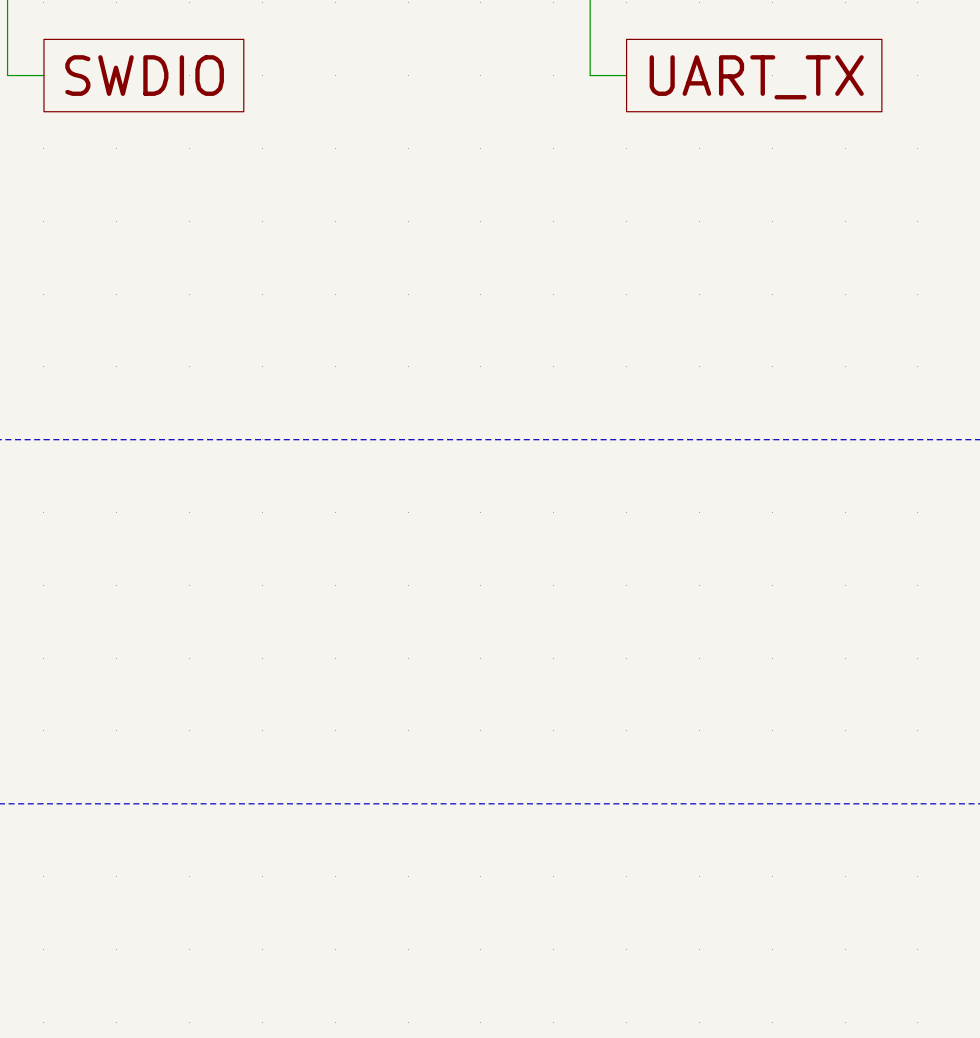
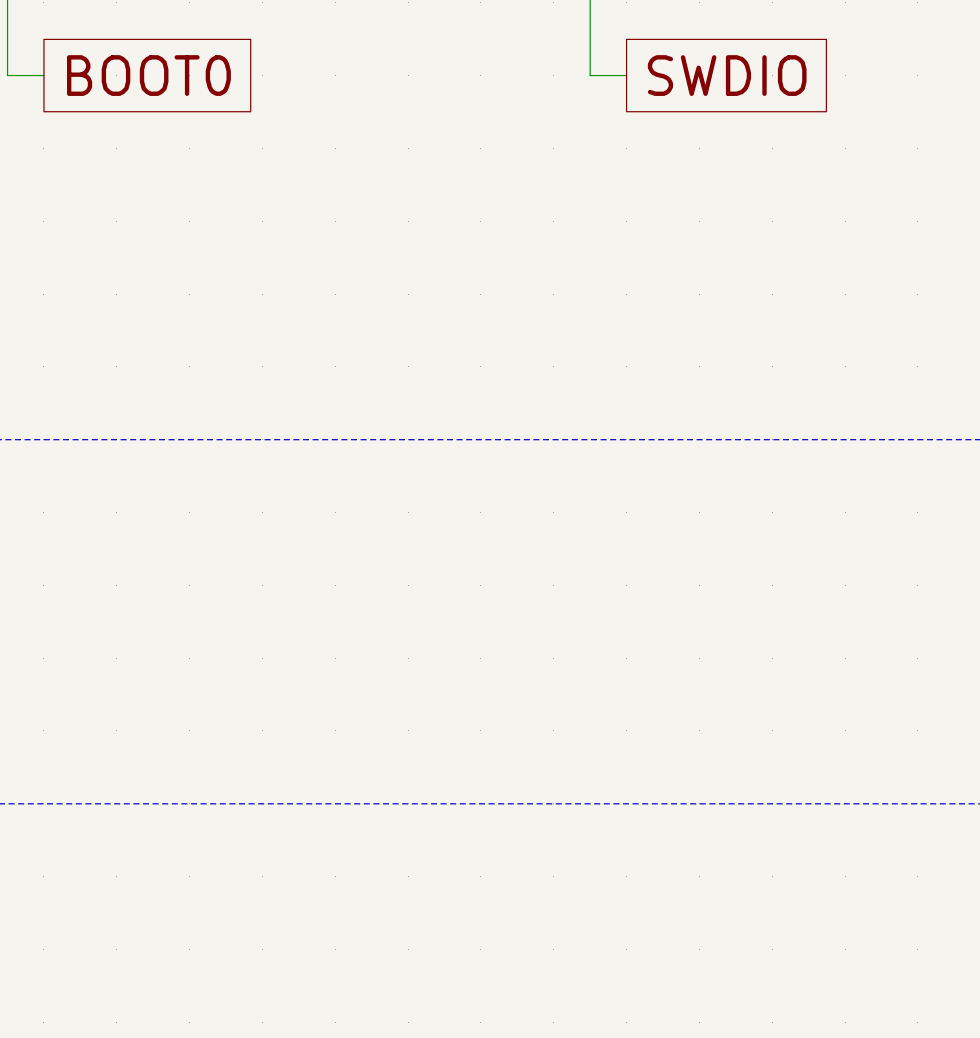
global label: SWDIO (144, 75) -> BOOT0 (148, 75)
global label: UART_TX (756, 77) -> SWDIO (727, 75)

